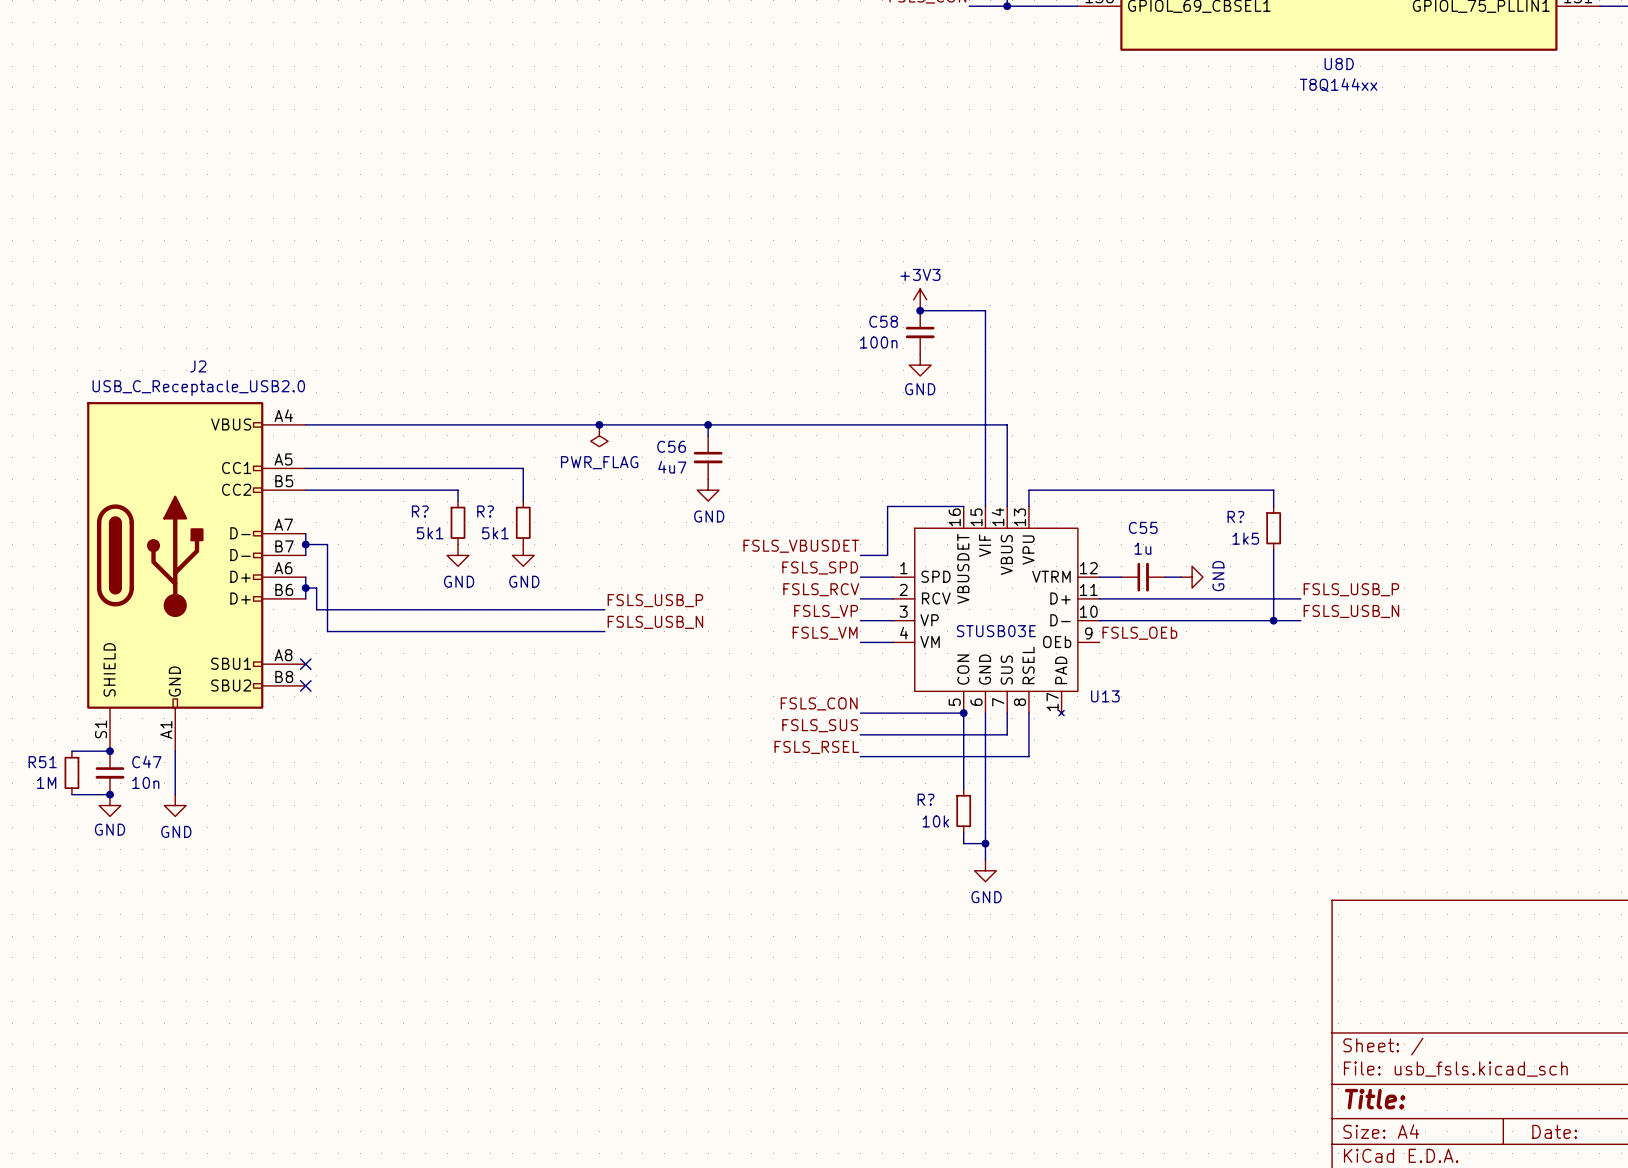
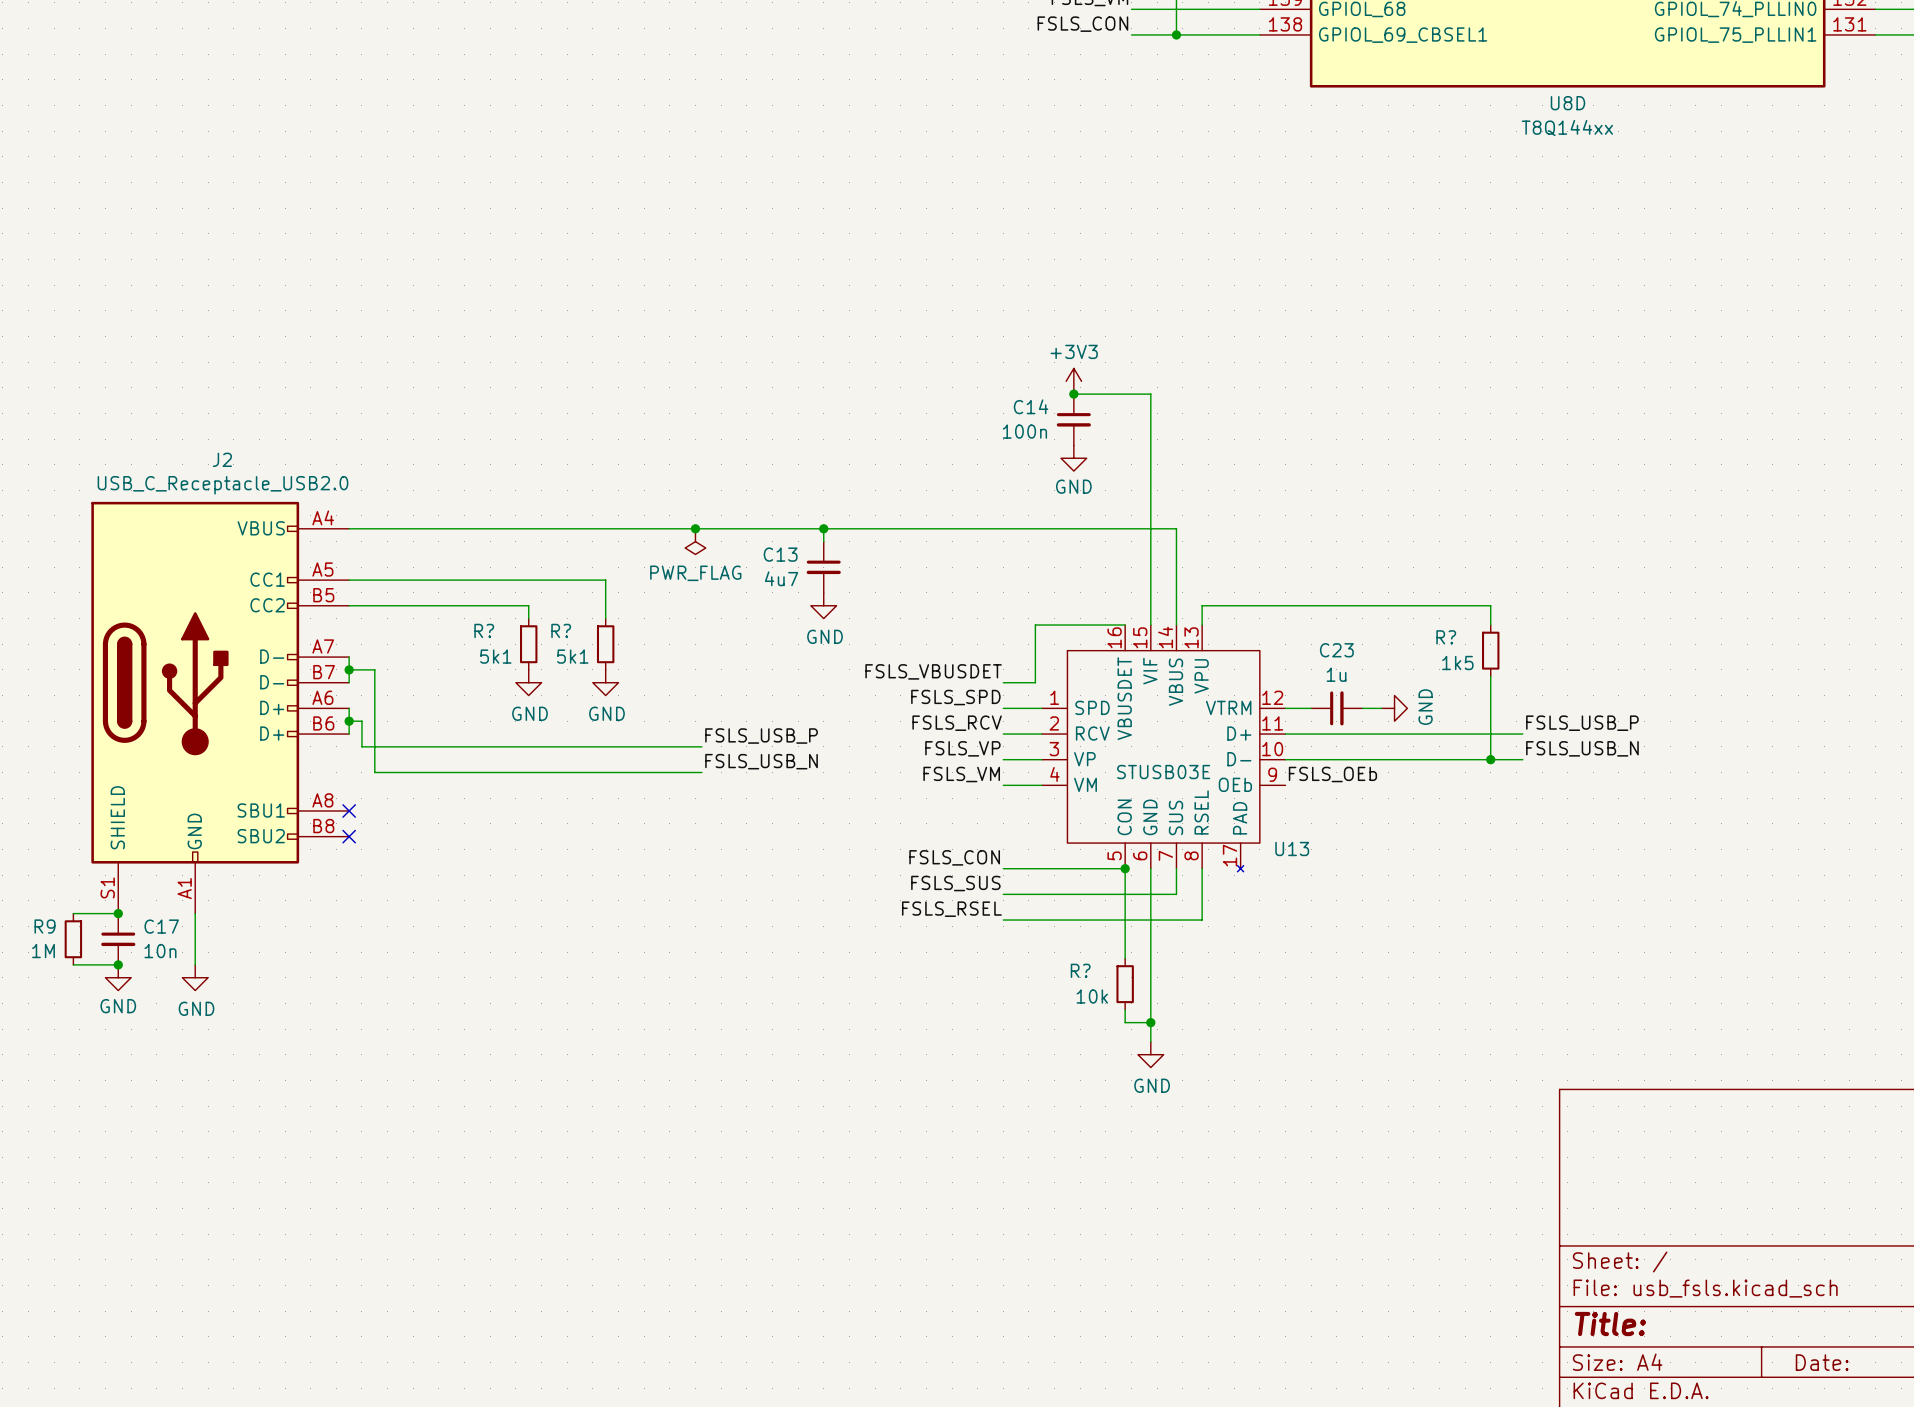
C58 name: C58 (883, 321) -> C14 (1031, 406)
C56 name: C56 (671, 446) -> C13 (780, 554)
C55 name: C55 (1143, 527) -> C23 (1336, 650)
C47 name: C47 (146, 761) -> C17 (161, 926)
R51 name: R51 (42, 762) -> R9 (45, 926)

